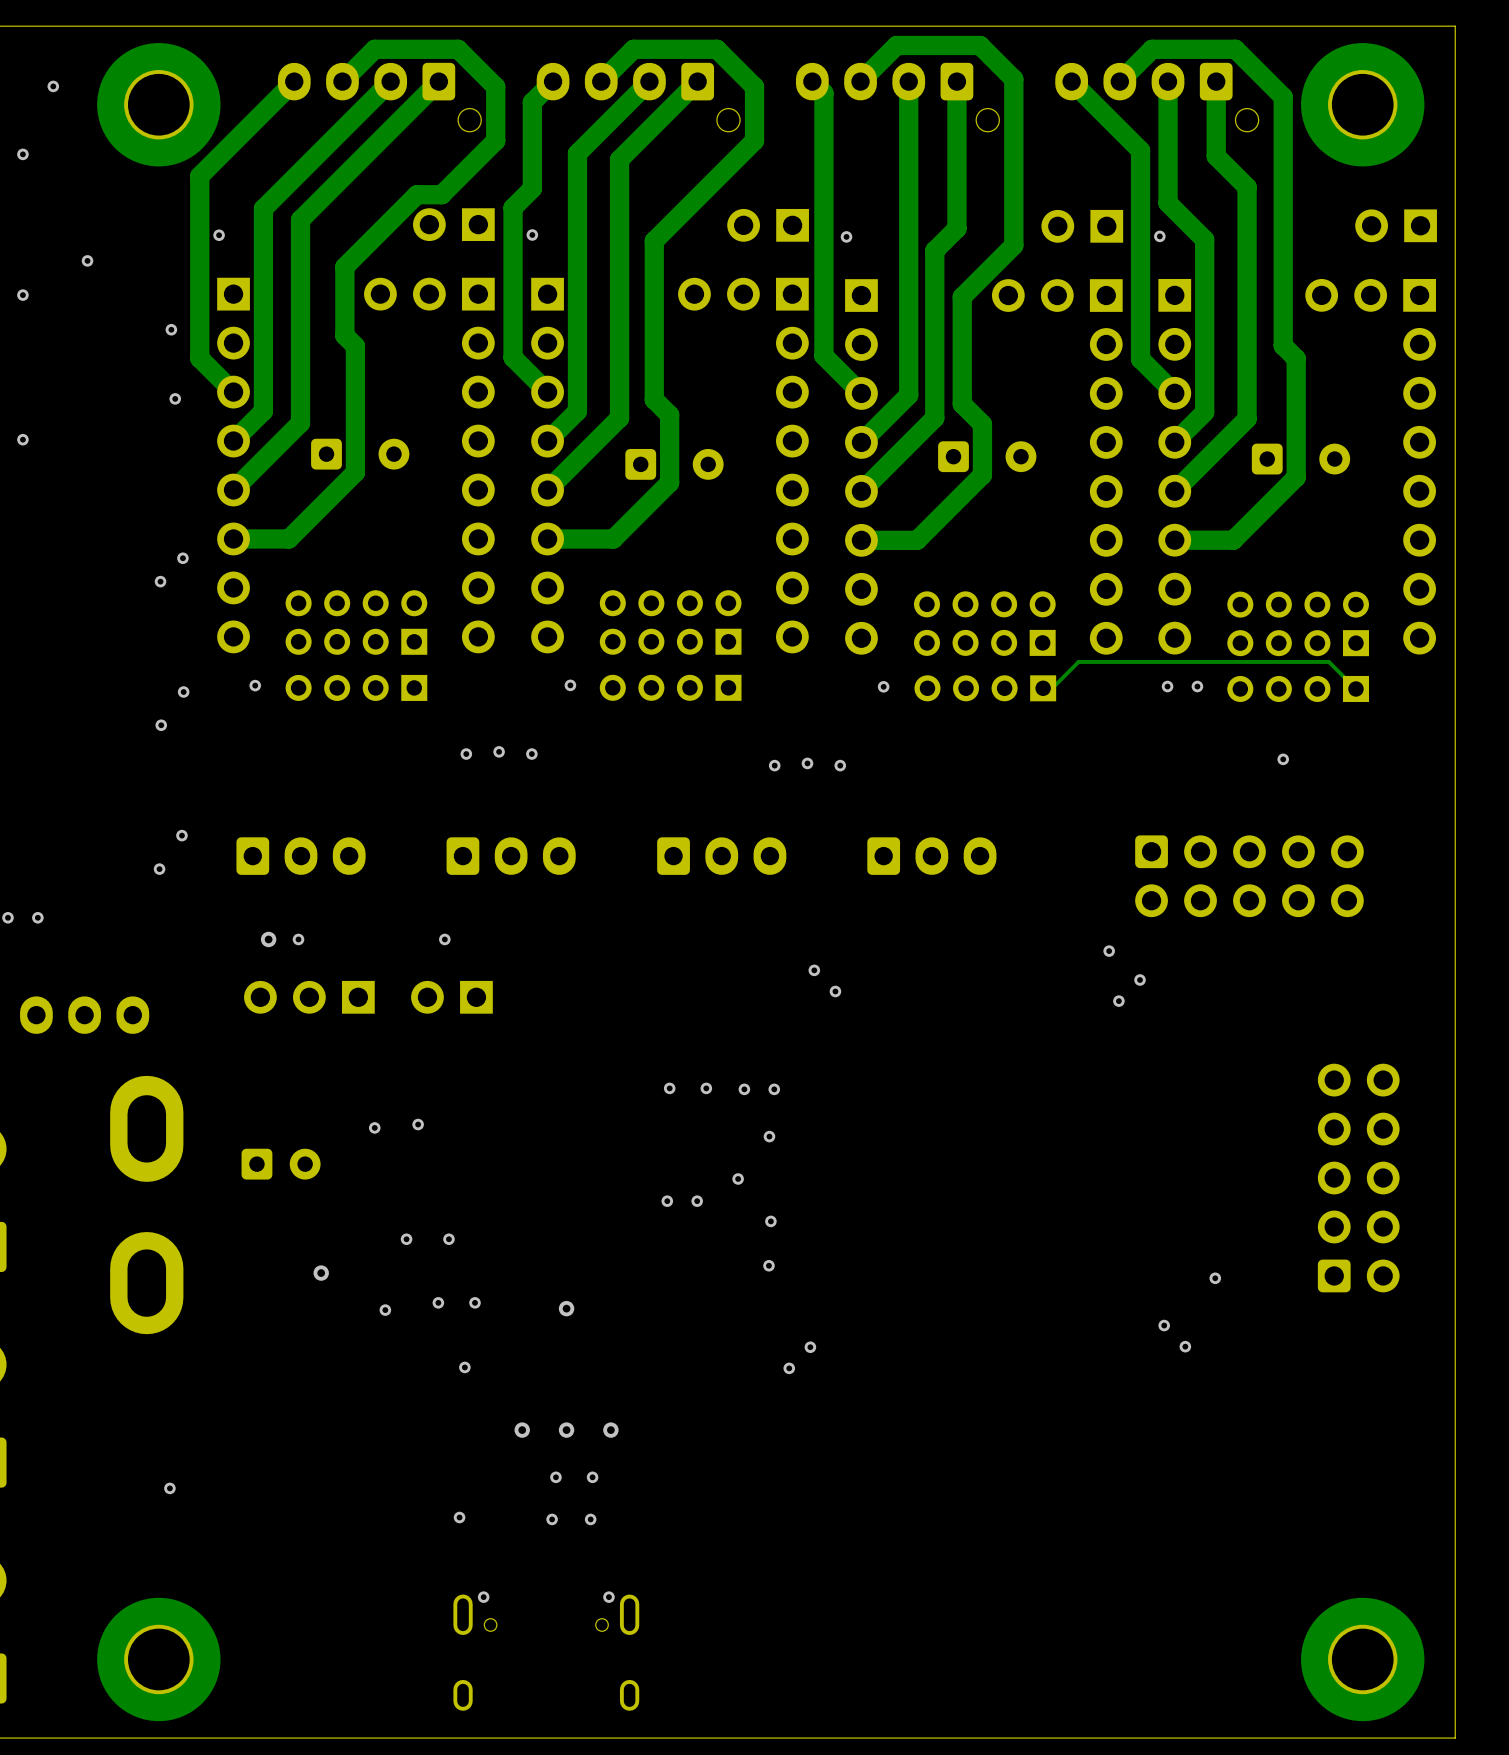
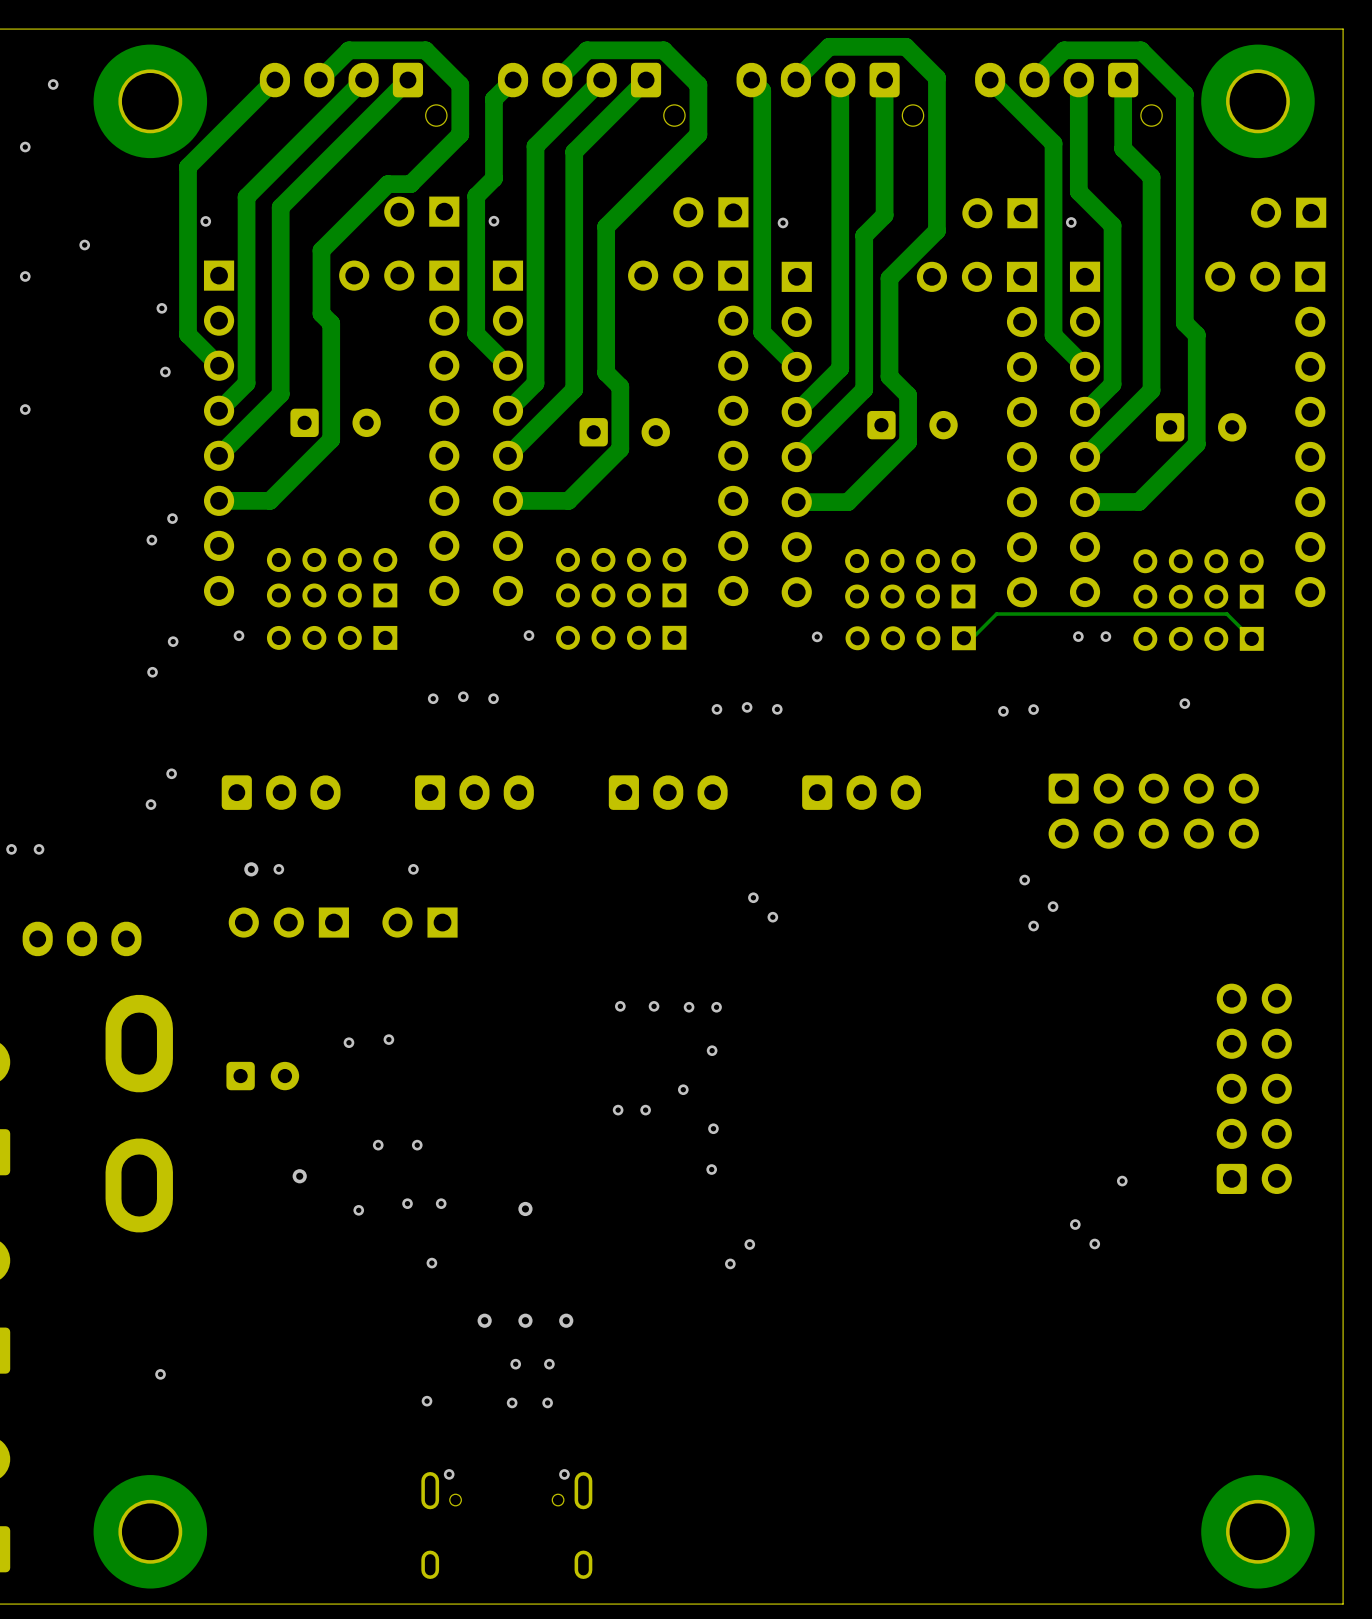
via: none -> (1033, 709)
via: none -> (1003, 711)

